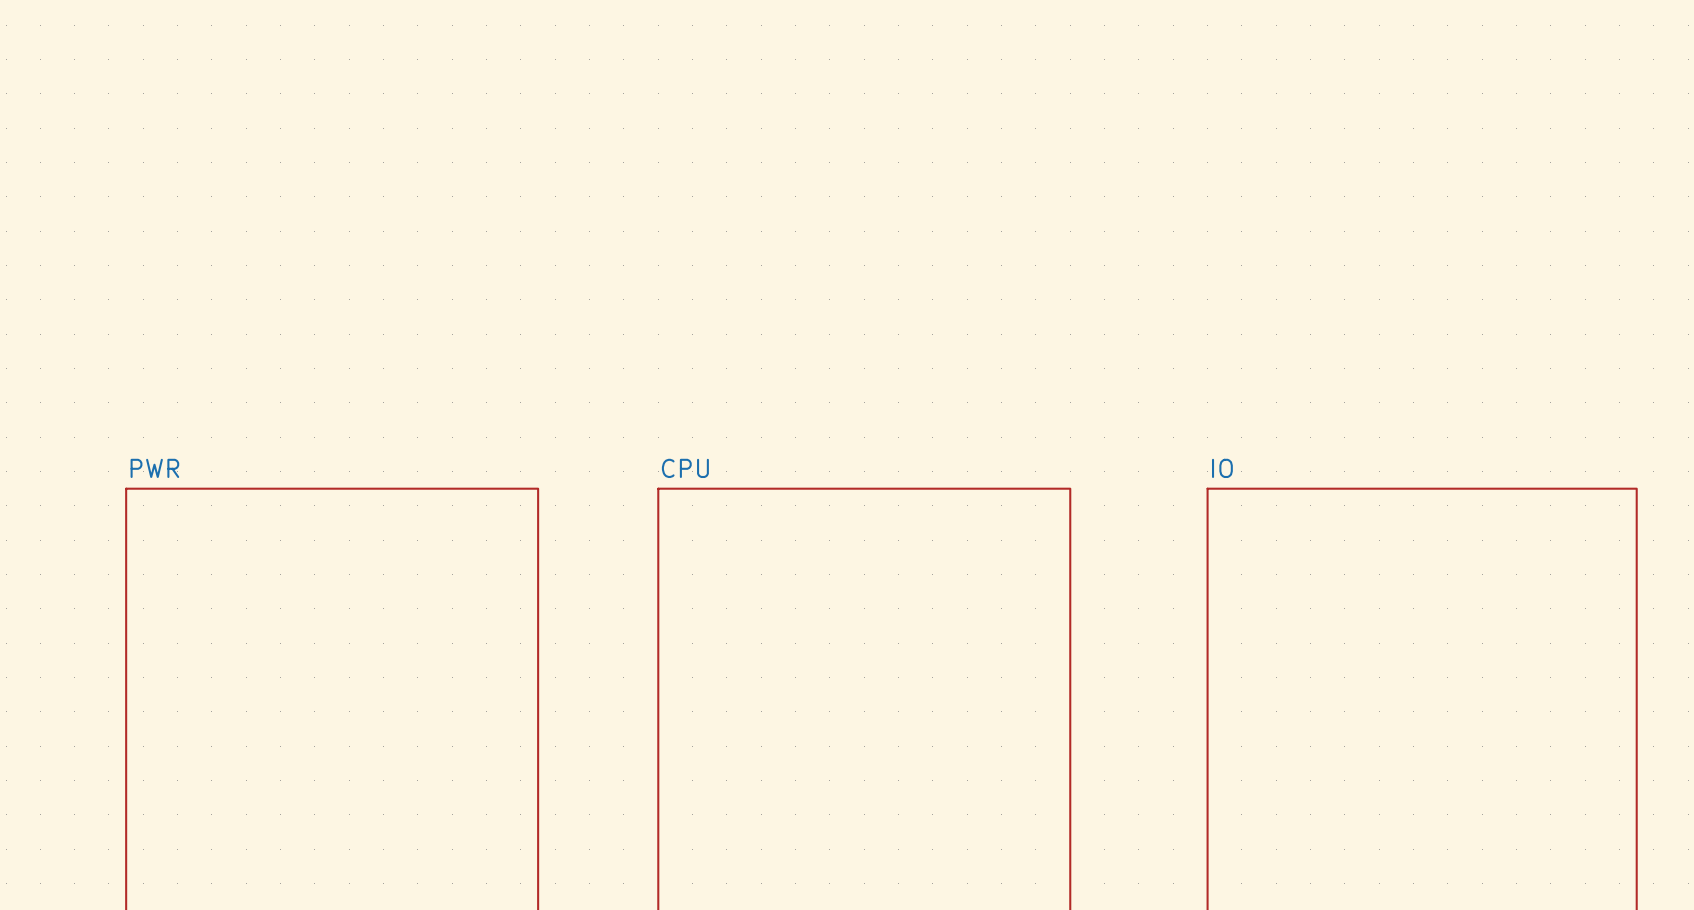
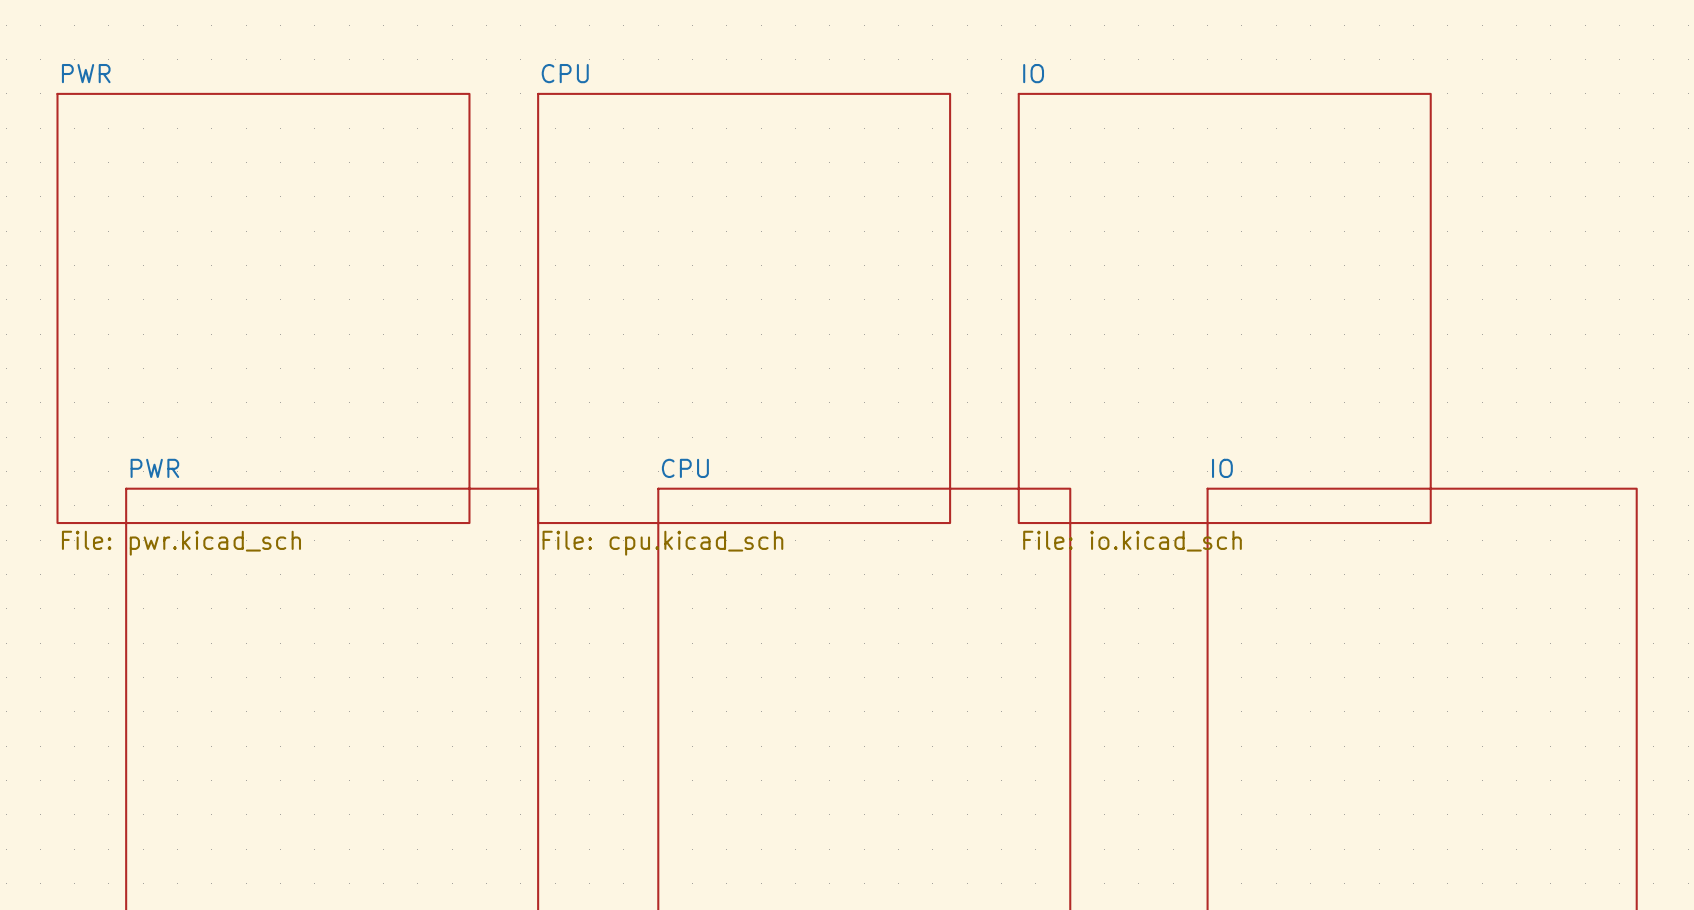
sheet PWR: none -> File: pwr.kicad_sch (263, 308)
sheet CPU: none -> File: cpu.kicad_sch (744, 308)
sheet IO: none -> File: io.kicad_sch (1224, 308)

